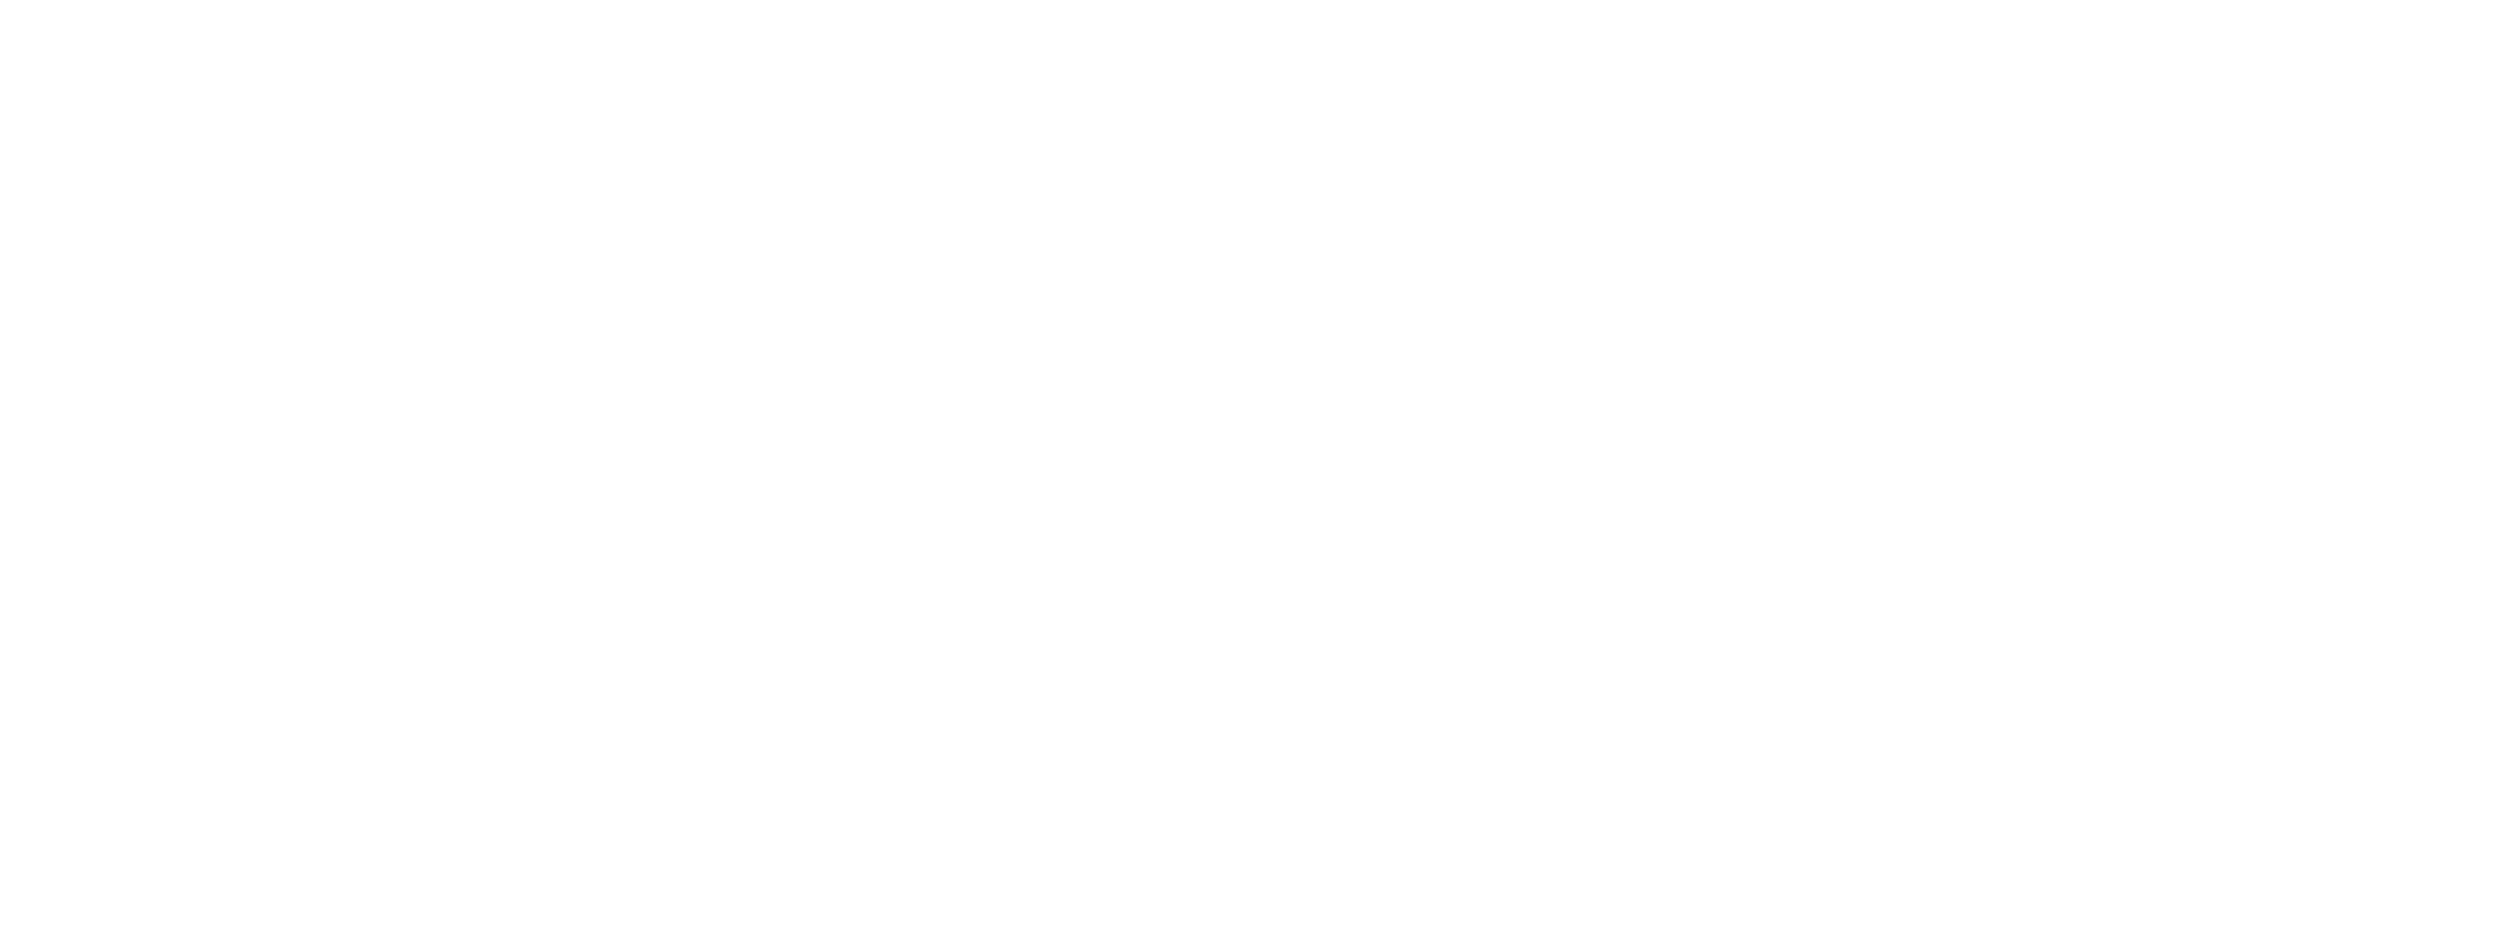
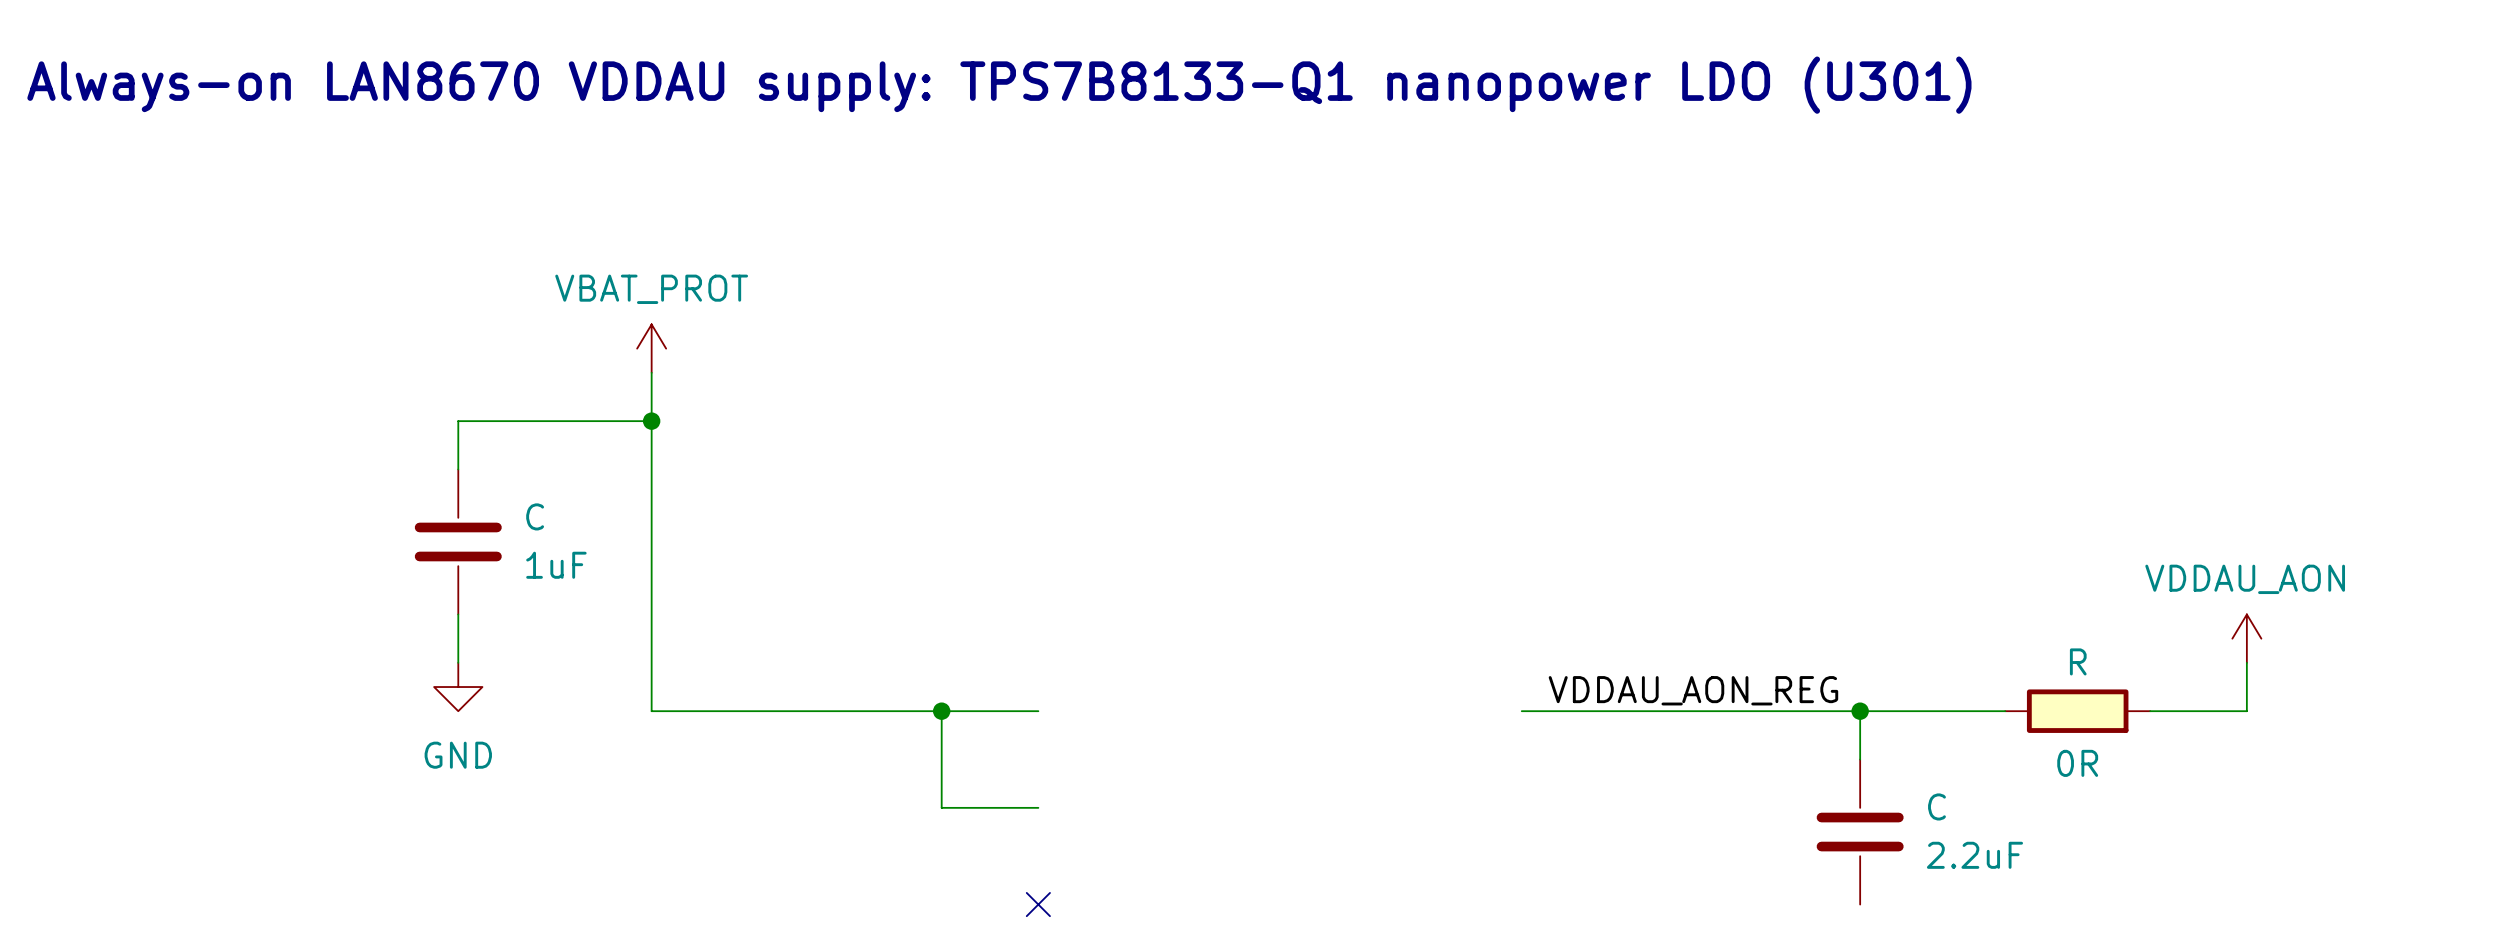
text: none -> Always-on LAN8670 VDDAU supply: TPS7B8133-Q1 nanopower LDO (U301) (999, 85)
power symbol: none -> VBAT_PROT (651, 348)
wire: none -> (651, 372) (651, 711) (1038, 711)
wire: none -> (651, 421) (458, 421) (458, 469)
junction: none -> (651, 421)
C: none -> 1uF (458, 541)
wire: none -> (458, 614) (458, 662)
power symbol: none -> VDDAU_AON (2246, 638)
wire: none -> (2246, 662) (2246, 711) (2150, 711)
power symbol: none -> GND (458, 687)
label: none -> VDDAU_AON_REG (1693, 690)
wire: none -> (941, 711) (941, 807) (1038, 807)
junction: none -> (941, 711)
wire: none -> (1521, 711) (2005, 711)
wire: none -> (1860, 711) (1860, 759)
junction: none -> (1860, 711)
R: none -> 0R (2077, 711)
C: none -> 2.2uF (1860, 832)
no-connect mark: none -> (1038, 904)

